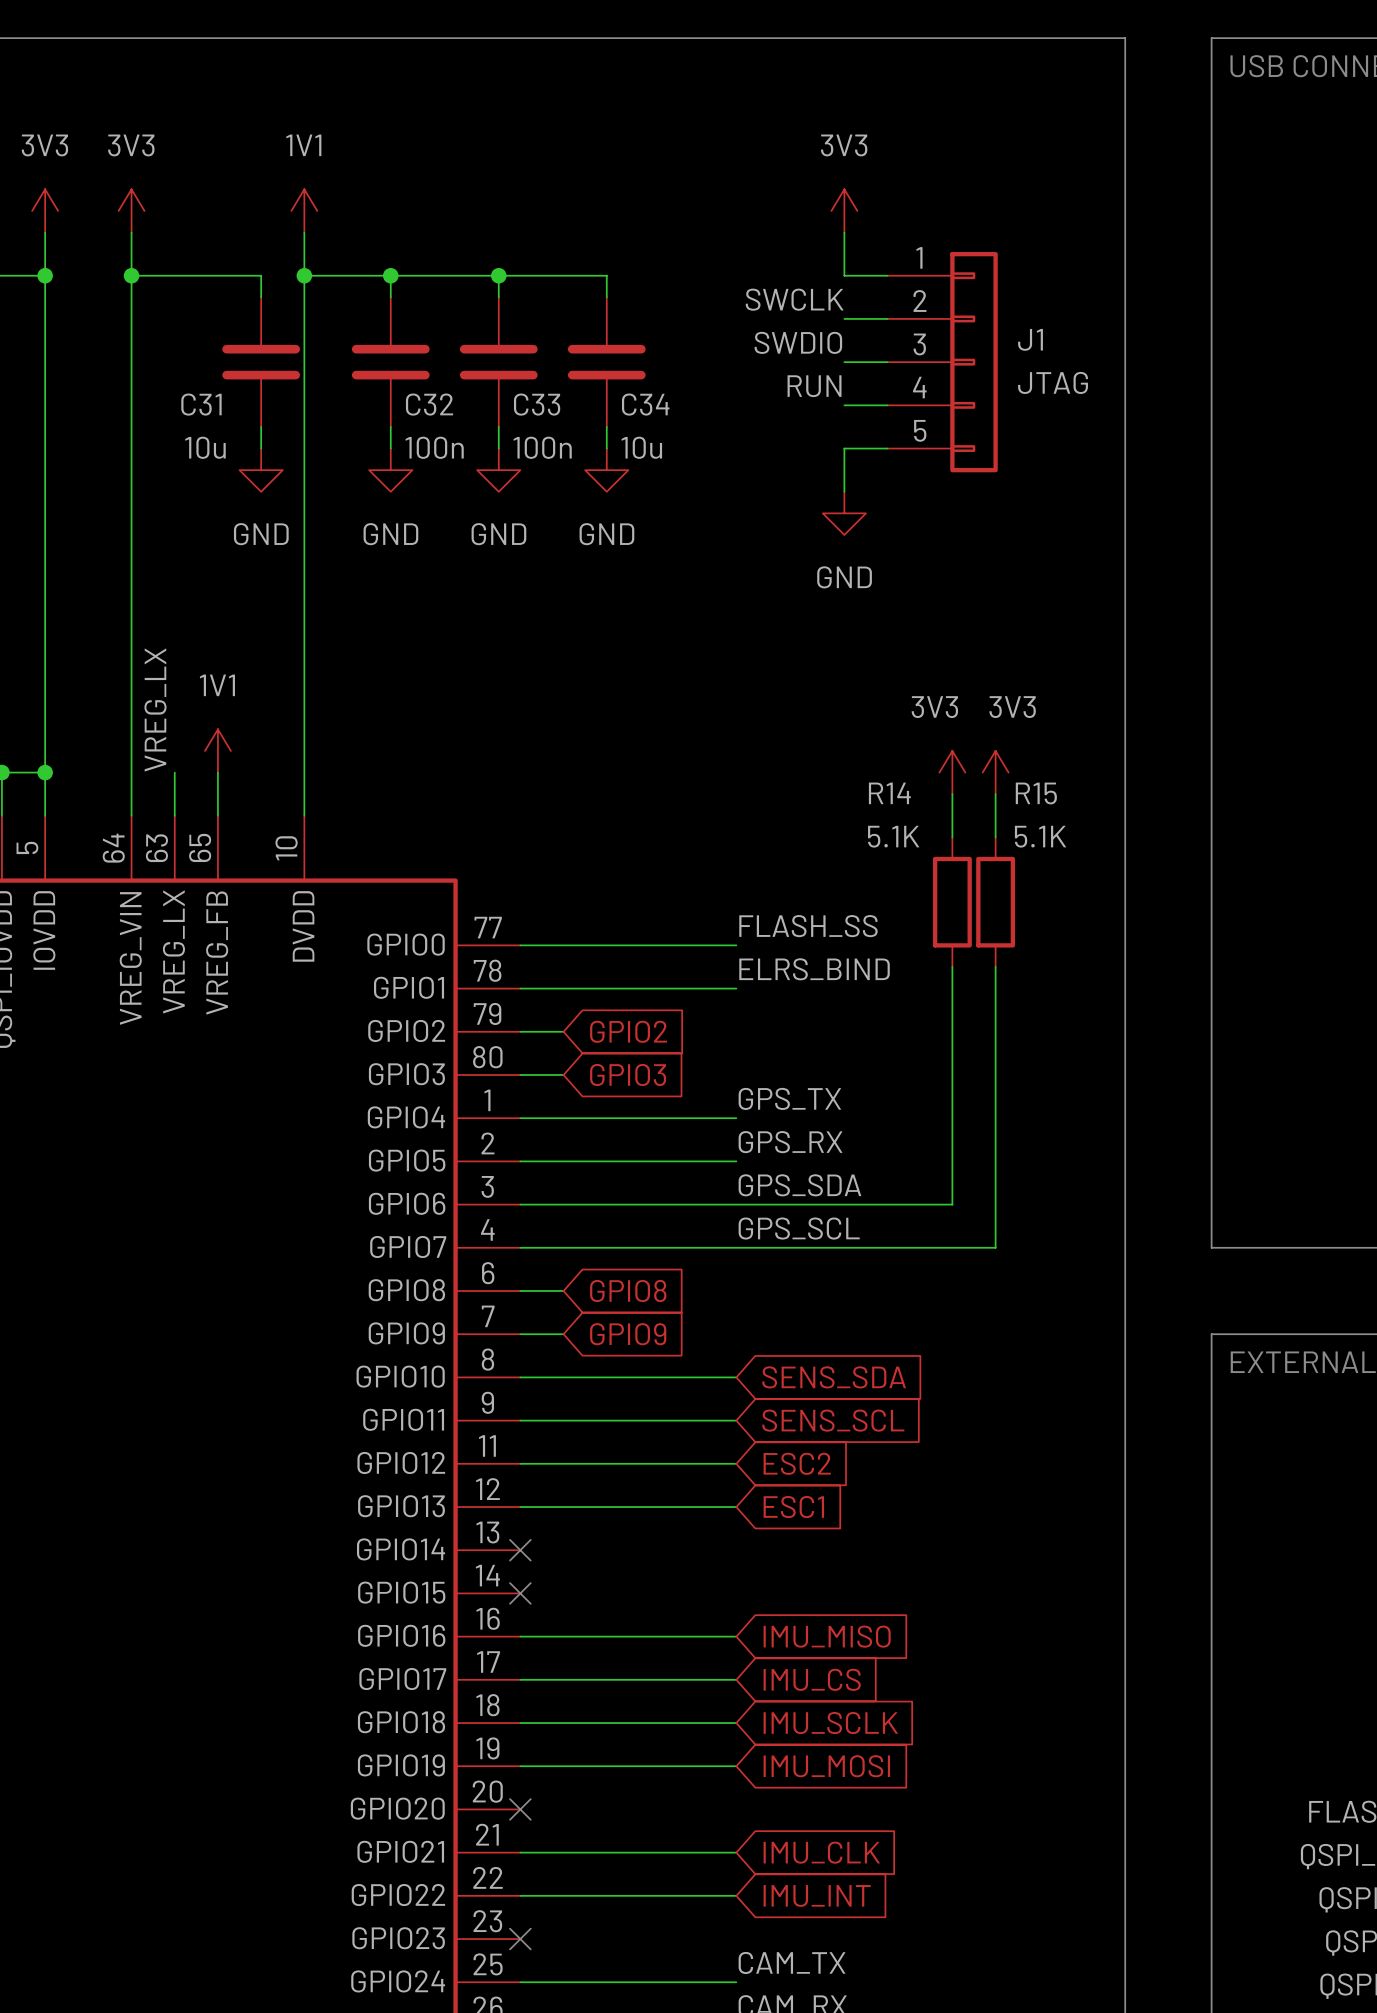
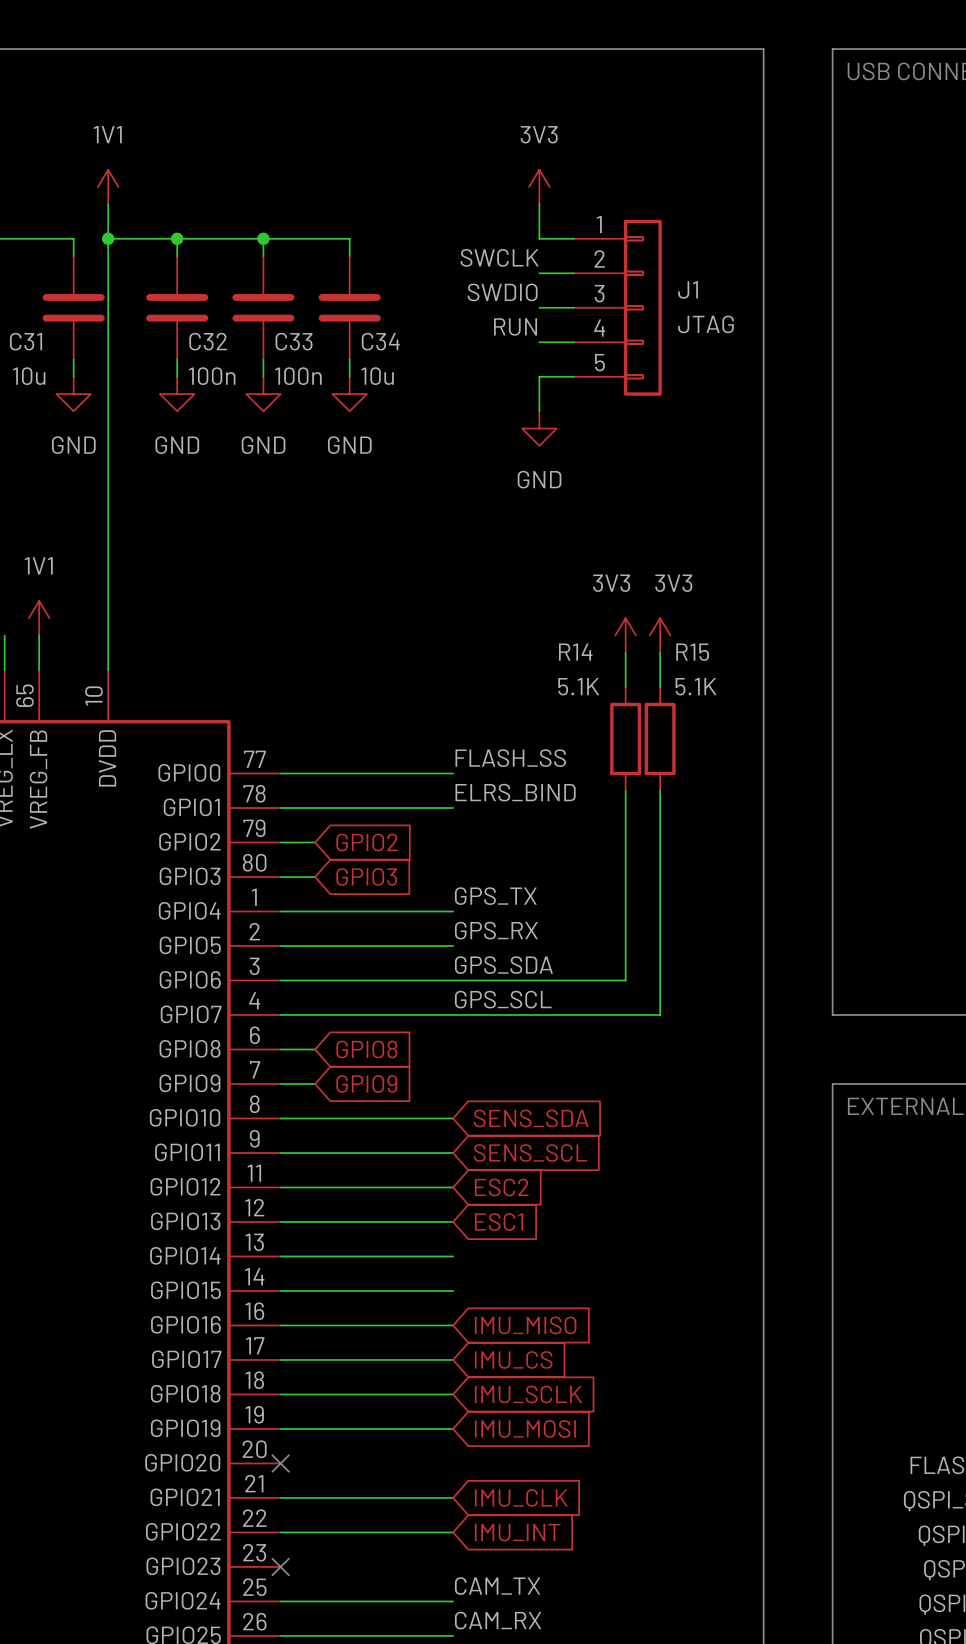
wire: none -> (280, 1256) (453, 1256)
no-connect mark: (520, 1550) -> none
wire: none -> (280, 1290) (453, 1290)
no-connect mark: (520, 1593) -> none

